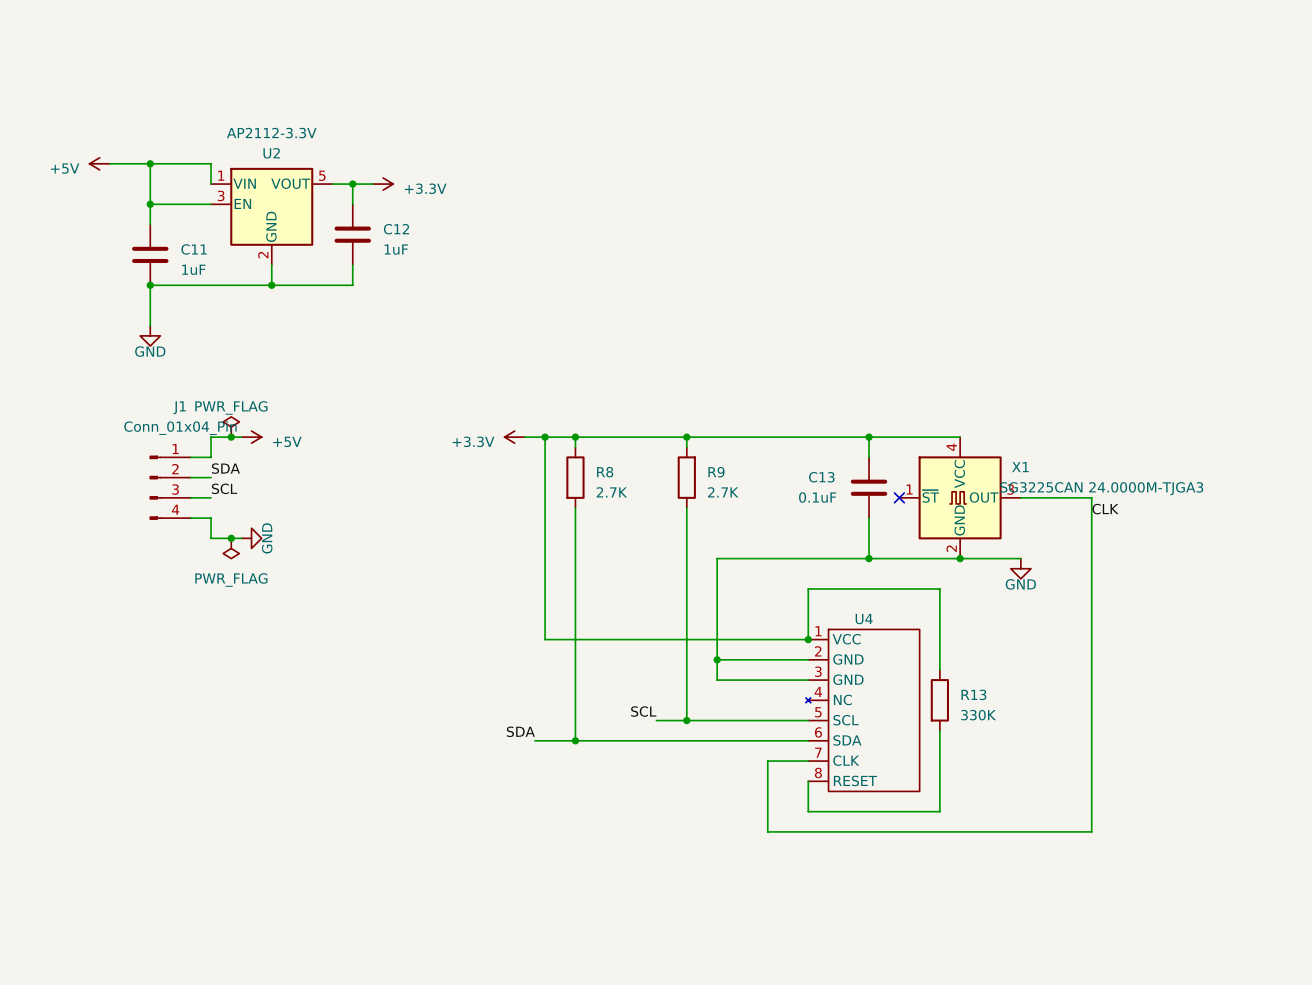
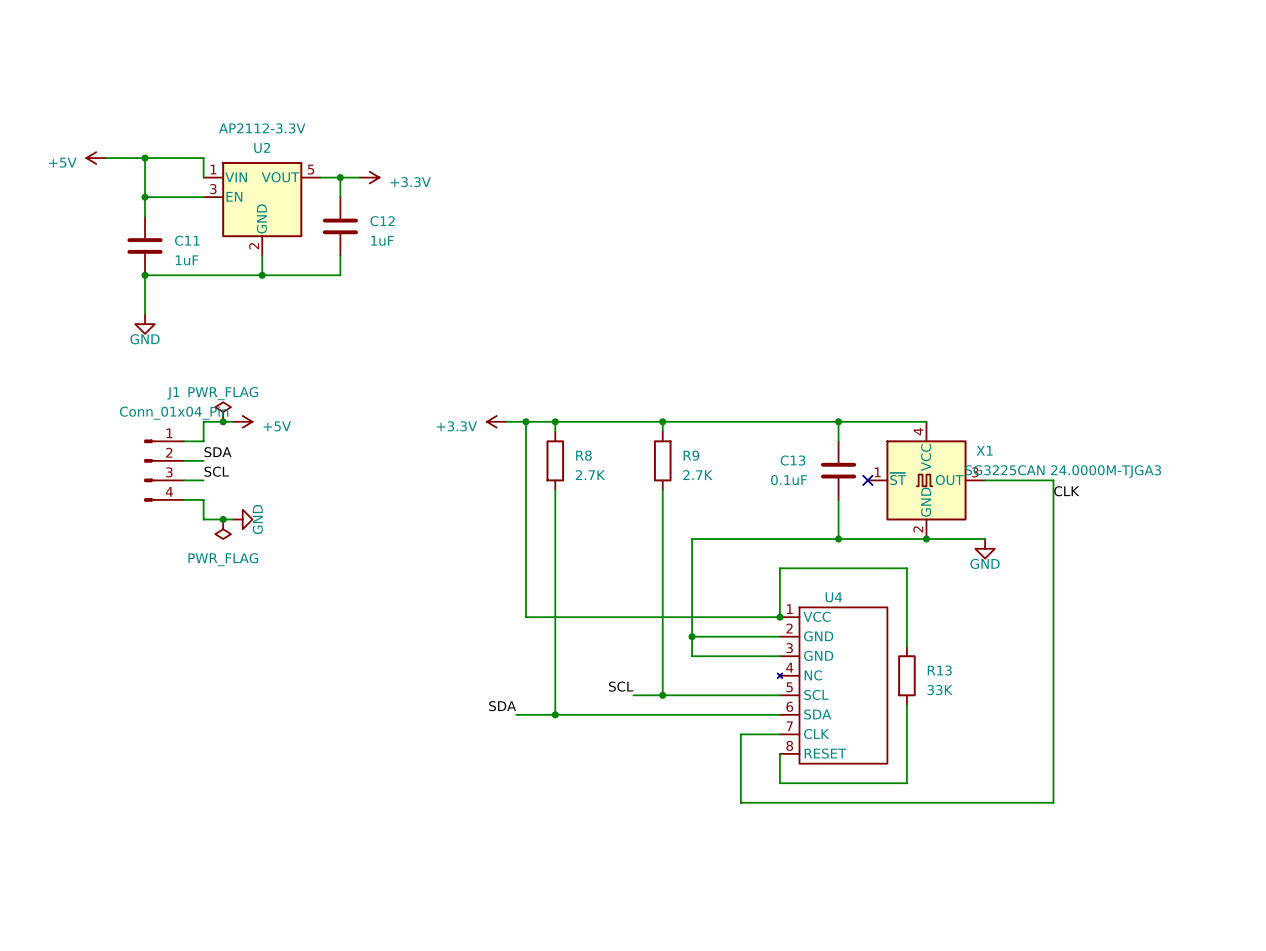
R13 value: 330K (978, 715) -> 33K (940, 690)

